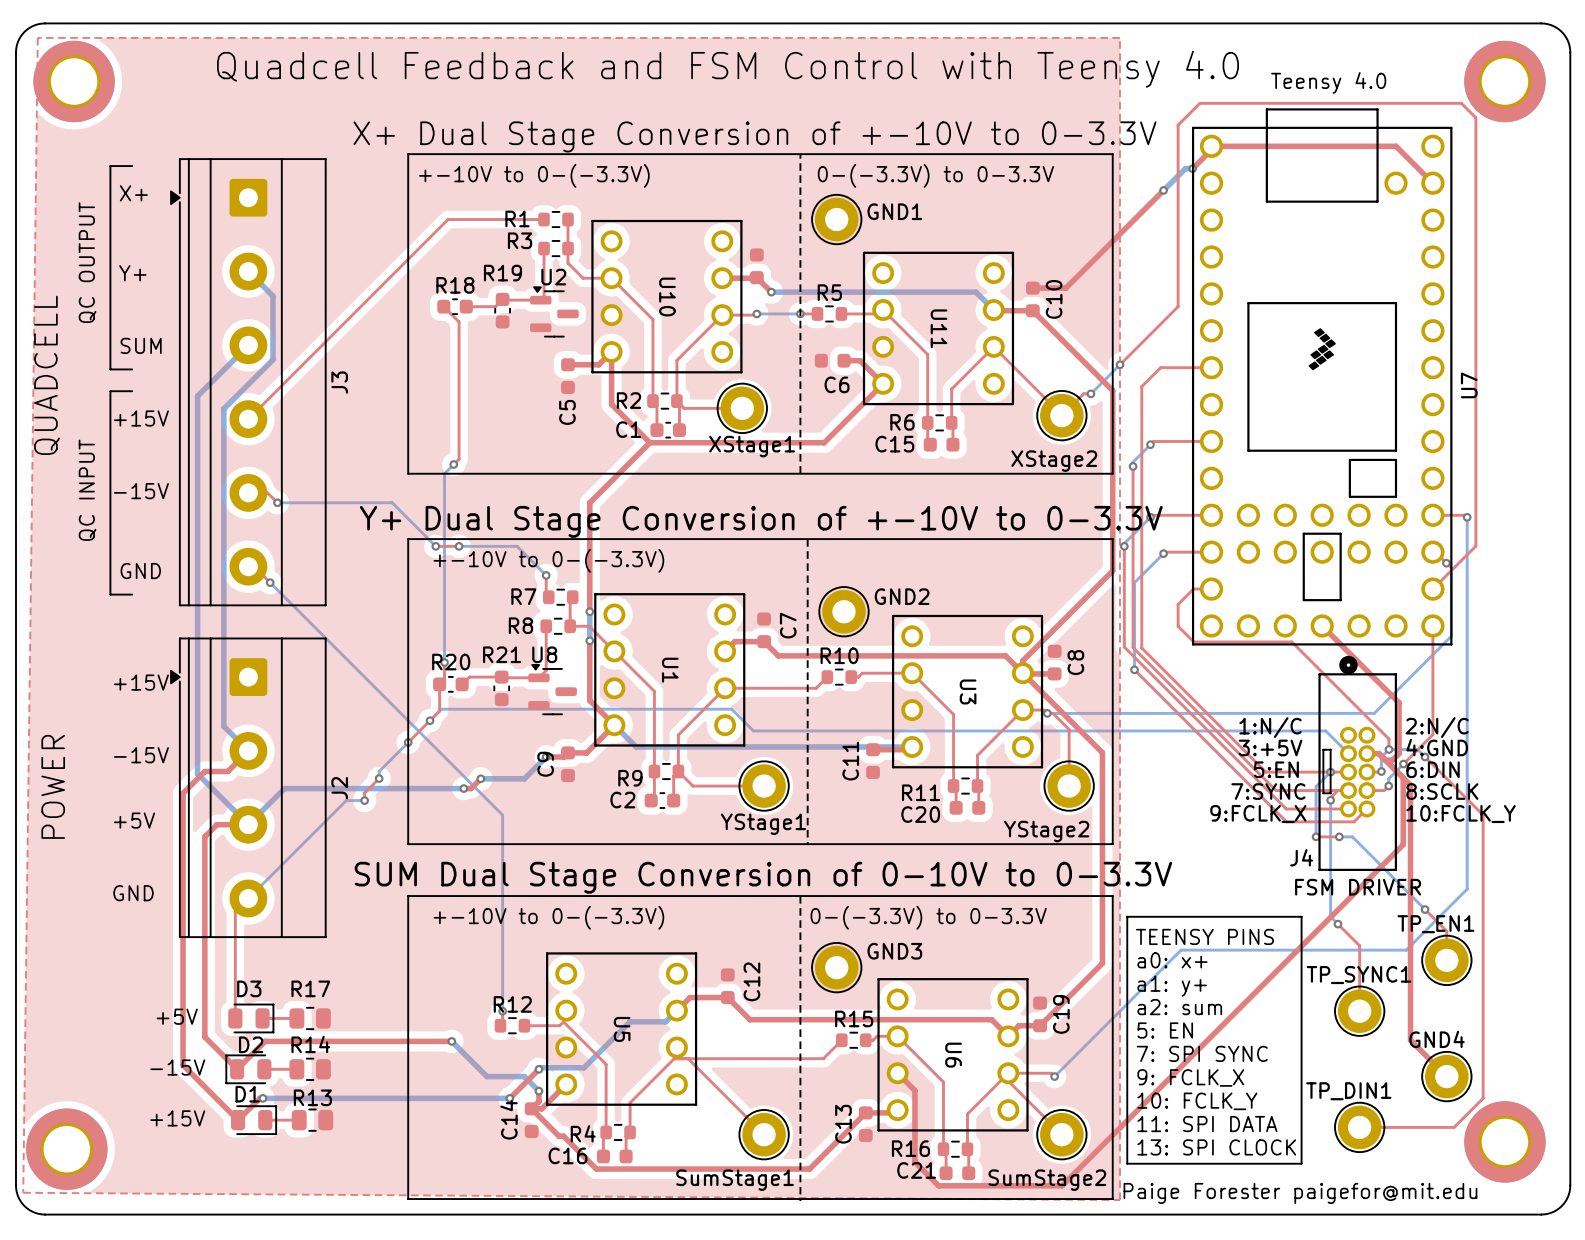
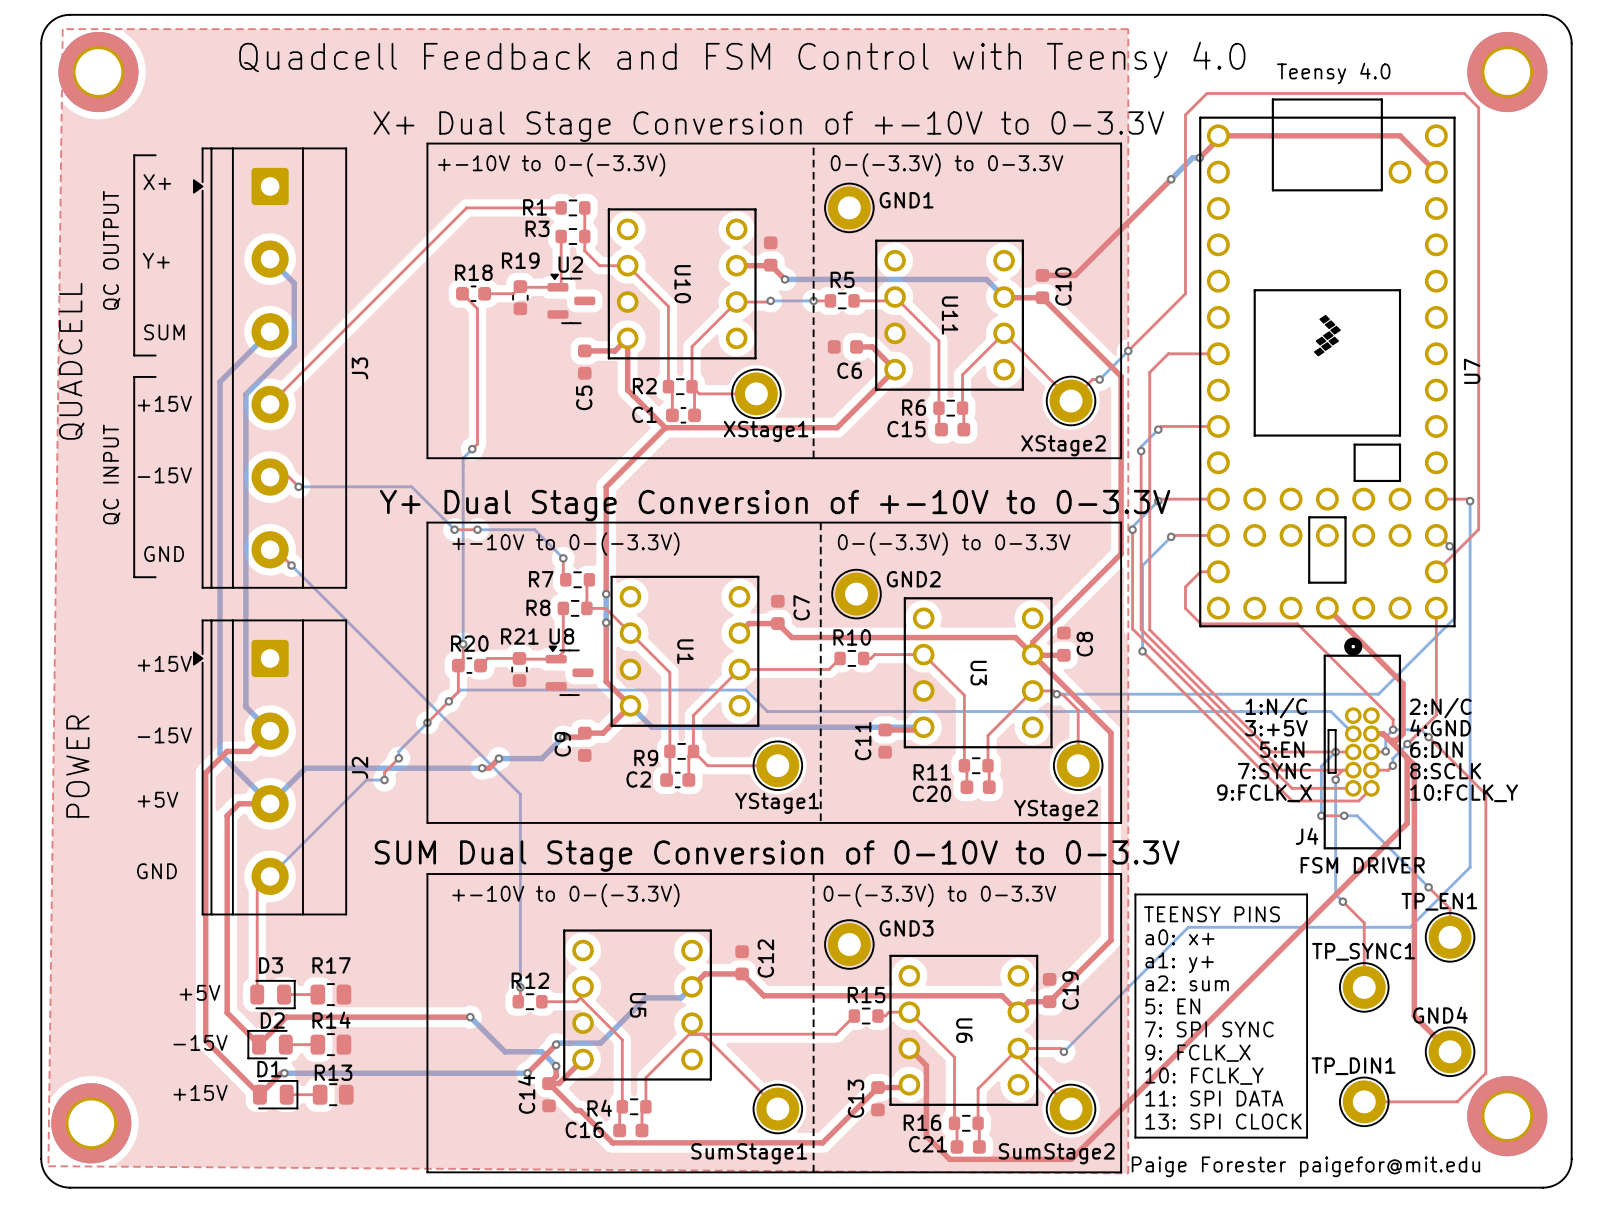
text: none -> 0-(-3.3V) to 0-3.3V (954, 543)

